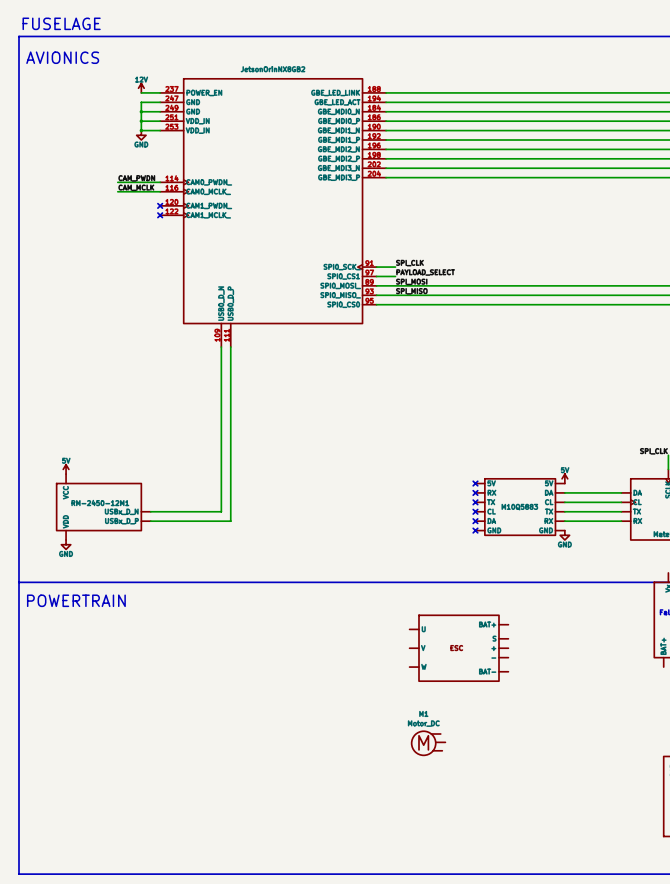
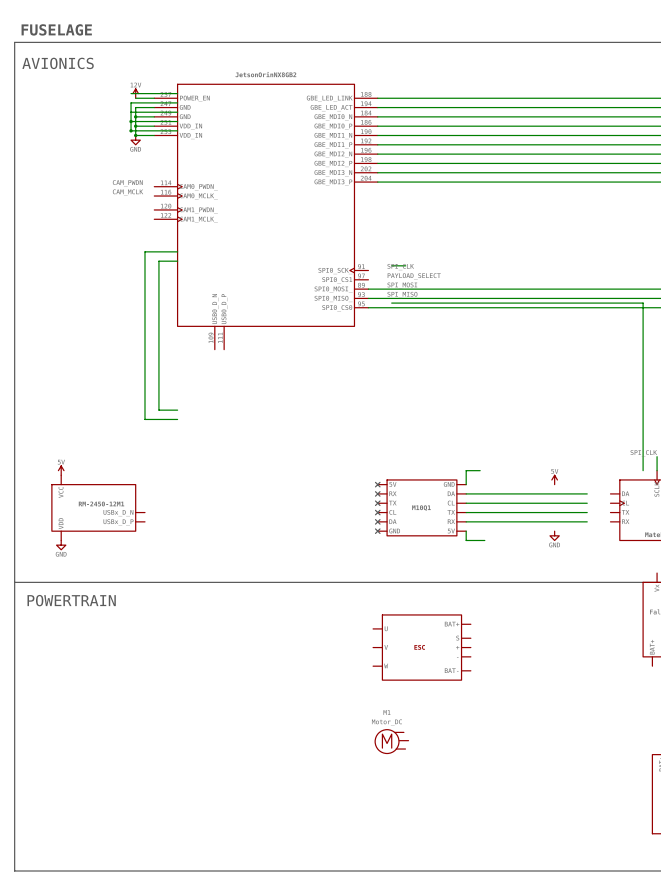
wire: none -> (131, 93) (177, 93)
wire: none -> (177, 102) (131, 102) (131, 130) (177, 130)
wire: none -> (131, 112) (177, 112)
wire: none -> (131, 121) (177, 121)
junction: none -> (131, 121)
junction: none -> (131, 130)
wire: (117, 182) (160, 182) -> none
wire: (117, 191) (160, 191) -> none
no-connect mark: (160, 205) -> none
no-connect mark: (160, 215) -> none
wire: none -> (177, 251) (144, 251) (144, 419) (177, 419)
wire: none -> (177, 261) (158, 261) (158, 410) (177, 410)
wire: none -> (391, 265) (405, 265)
wire: (376, 267) (395, 267) -> none
wire: (376, 276) (395, 276) -> none
wire: none -> (391, 303) (643, 303) (643, 470)
wire: (221, 347) (221, 511) (150, 511) -> none
wire: (230, 347) (230, 521) (150, 521) -> none
wire: none -> (480, 470) (466, 470) (466, 484)
no-connect mark: none -> (377, 484)
no-connect mark: (475, 483) -> none
no-connect mark: none -> (377, 493)
wire: none -> (466, 493) (554, 493)
no-connect mark: (475, 492) -> none
wire: (597, 492) (621, 492) -> none
no-connect mark: none -> (377, 503)
wire: none -> (466, 503) (554, 503)
no-connect mark: (475, 502) -> none
wire: (597, 502) (621, 502) -> none
part: none -> (421, 507)
part: (520, 507) -> none
no-connect mark: none -> (377, 512)
wire: none -> (466, 512) (554, 512)
no-connect mark: (475, 511) -> none
wire: (597, 511) (621, 511) -> none
no-connect mark: none -> (377, 521)
wire: none -> (466, 521) (554, 521)
no-connect mark: (475, 521) -> none
wire: (597, 521) (621, 521) -> none
no-connect mark: none -> (377, 531)
wire: none -> (466, 531) (466, 540) (484, 540)
no-connect mark: (475, 530) -> none
part position: (458, 648) -> (421, 647)
part position: (428, 743) -> (391, 741)

